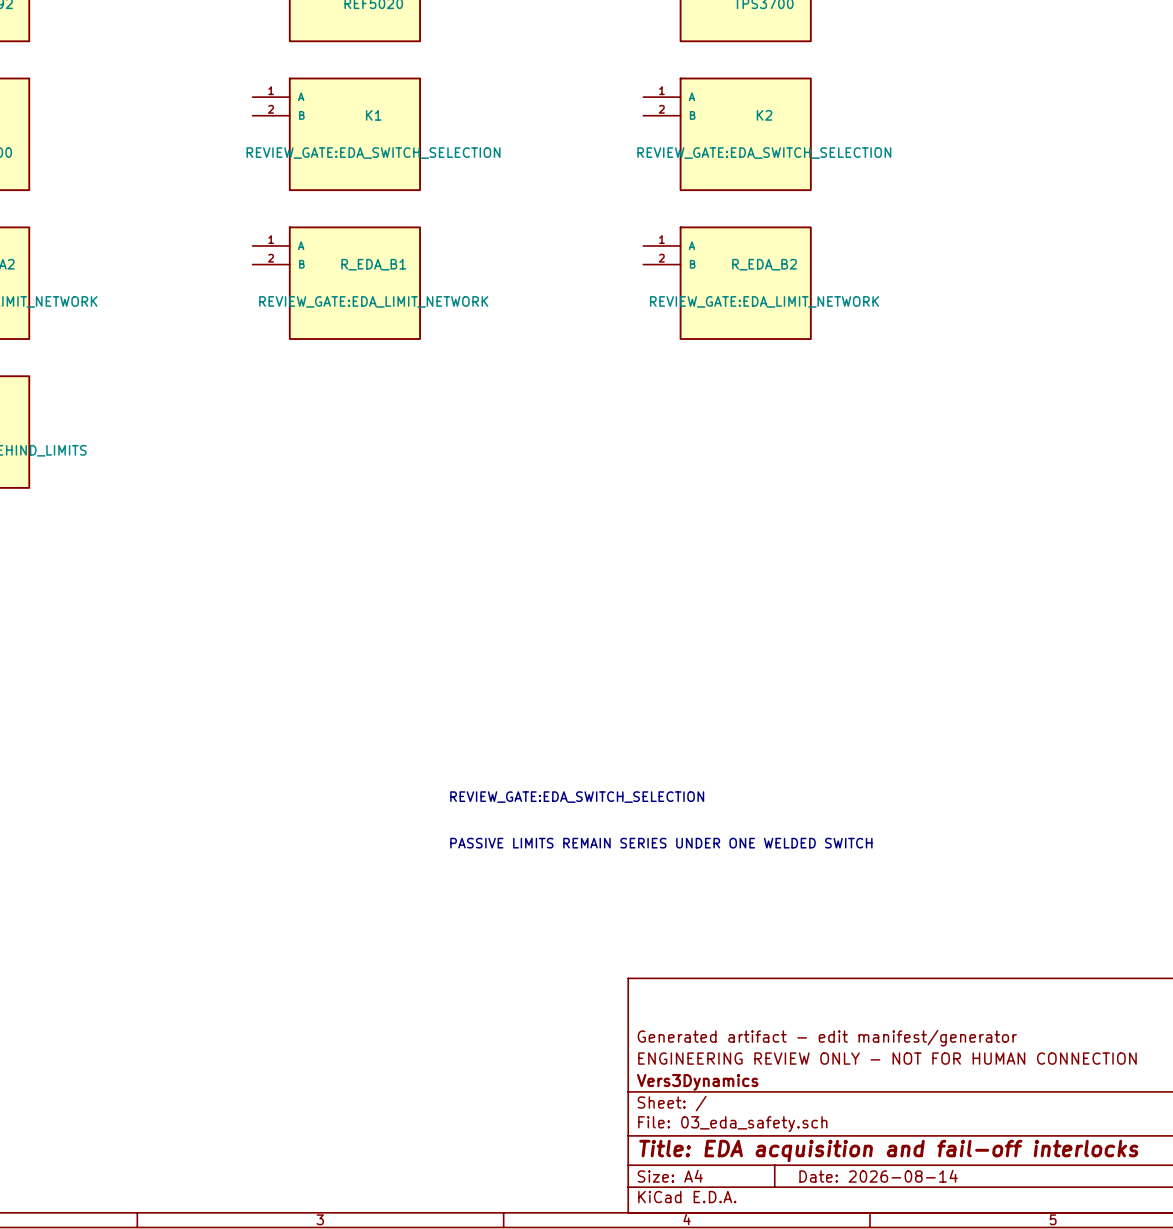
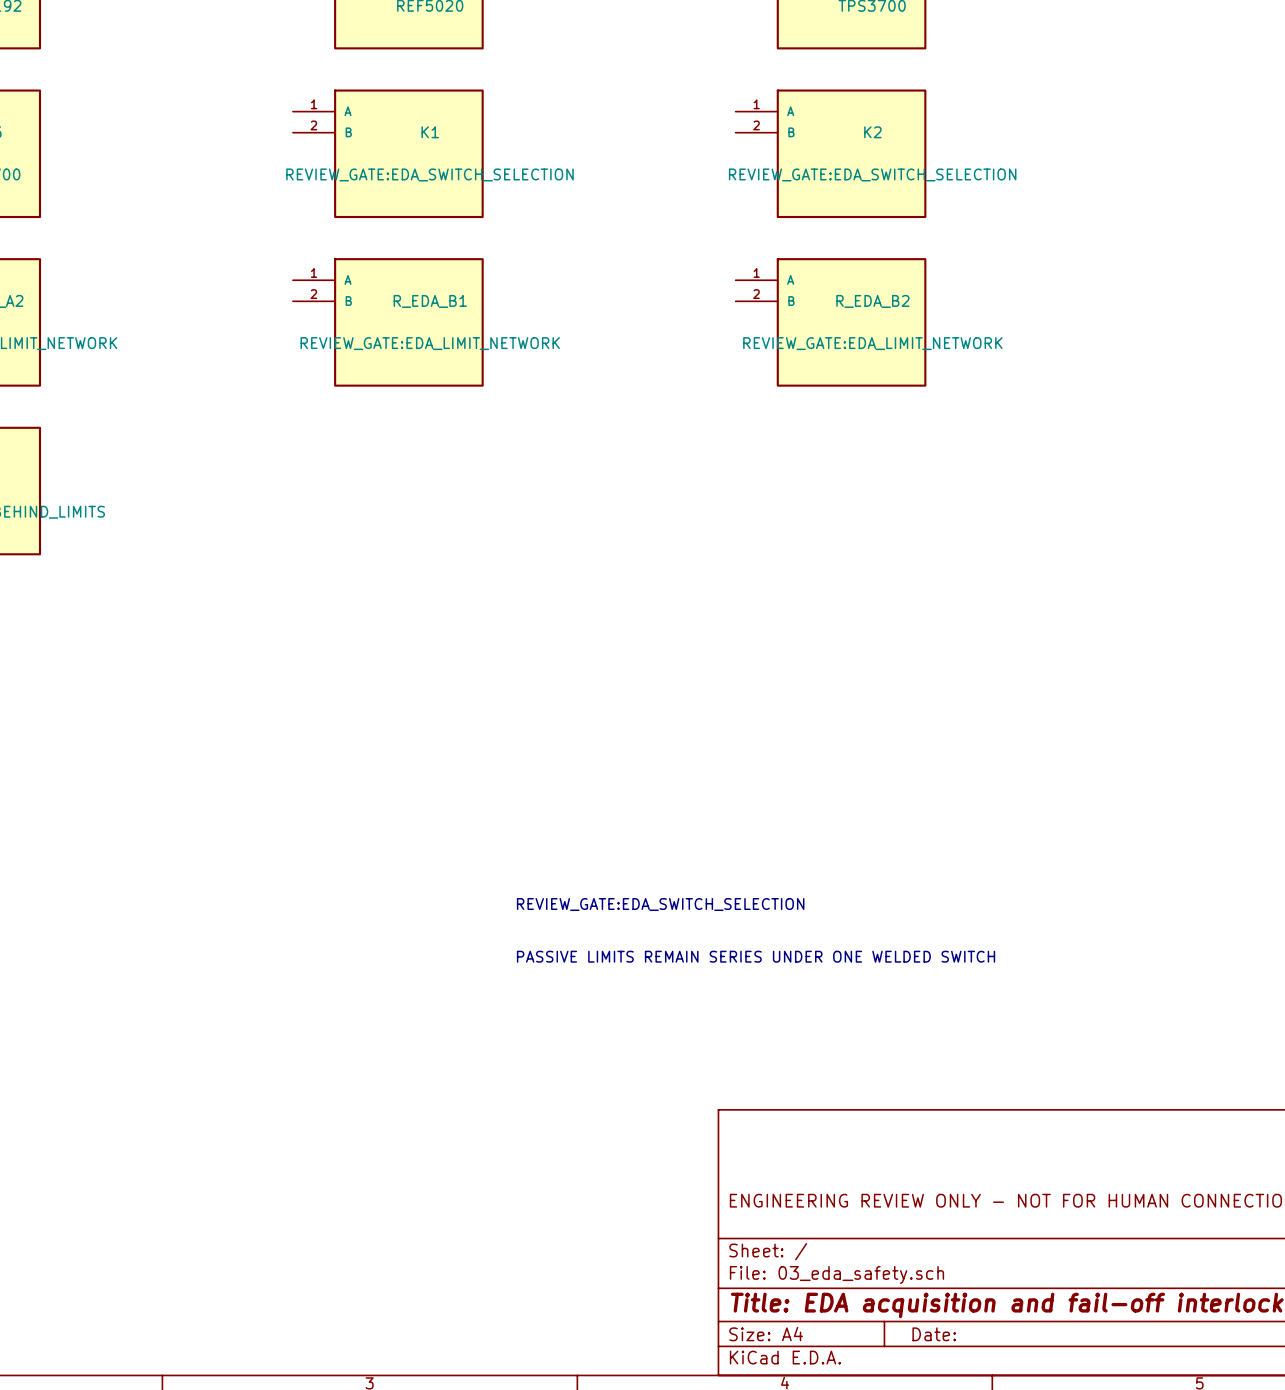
title block: Generated artifact - edit manifest/generator (827, 1038) -> none
title block: Vers3Dynamics (697, 1082) -> none
title block: Date: 2026-08-14 (878, 1176) -> Date: (934, 1334)

